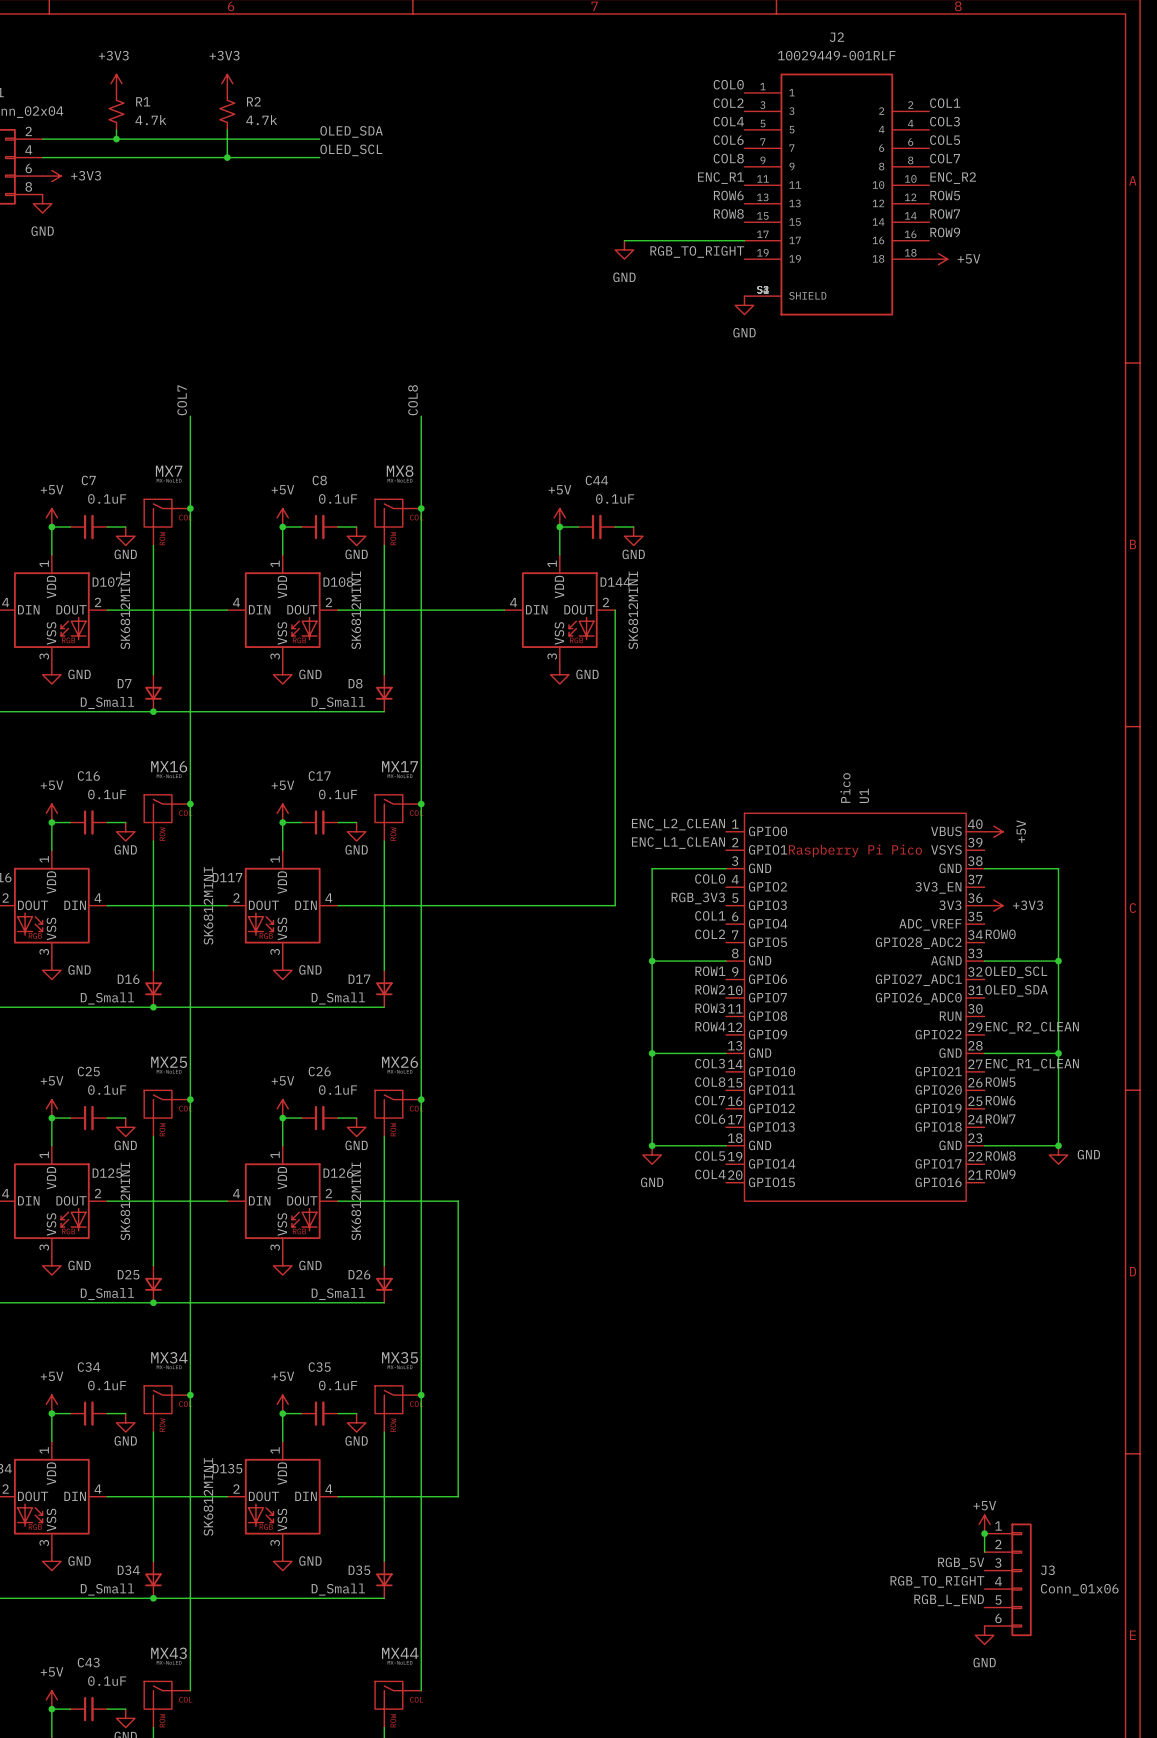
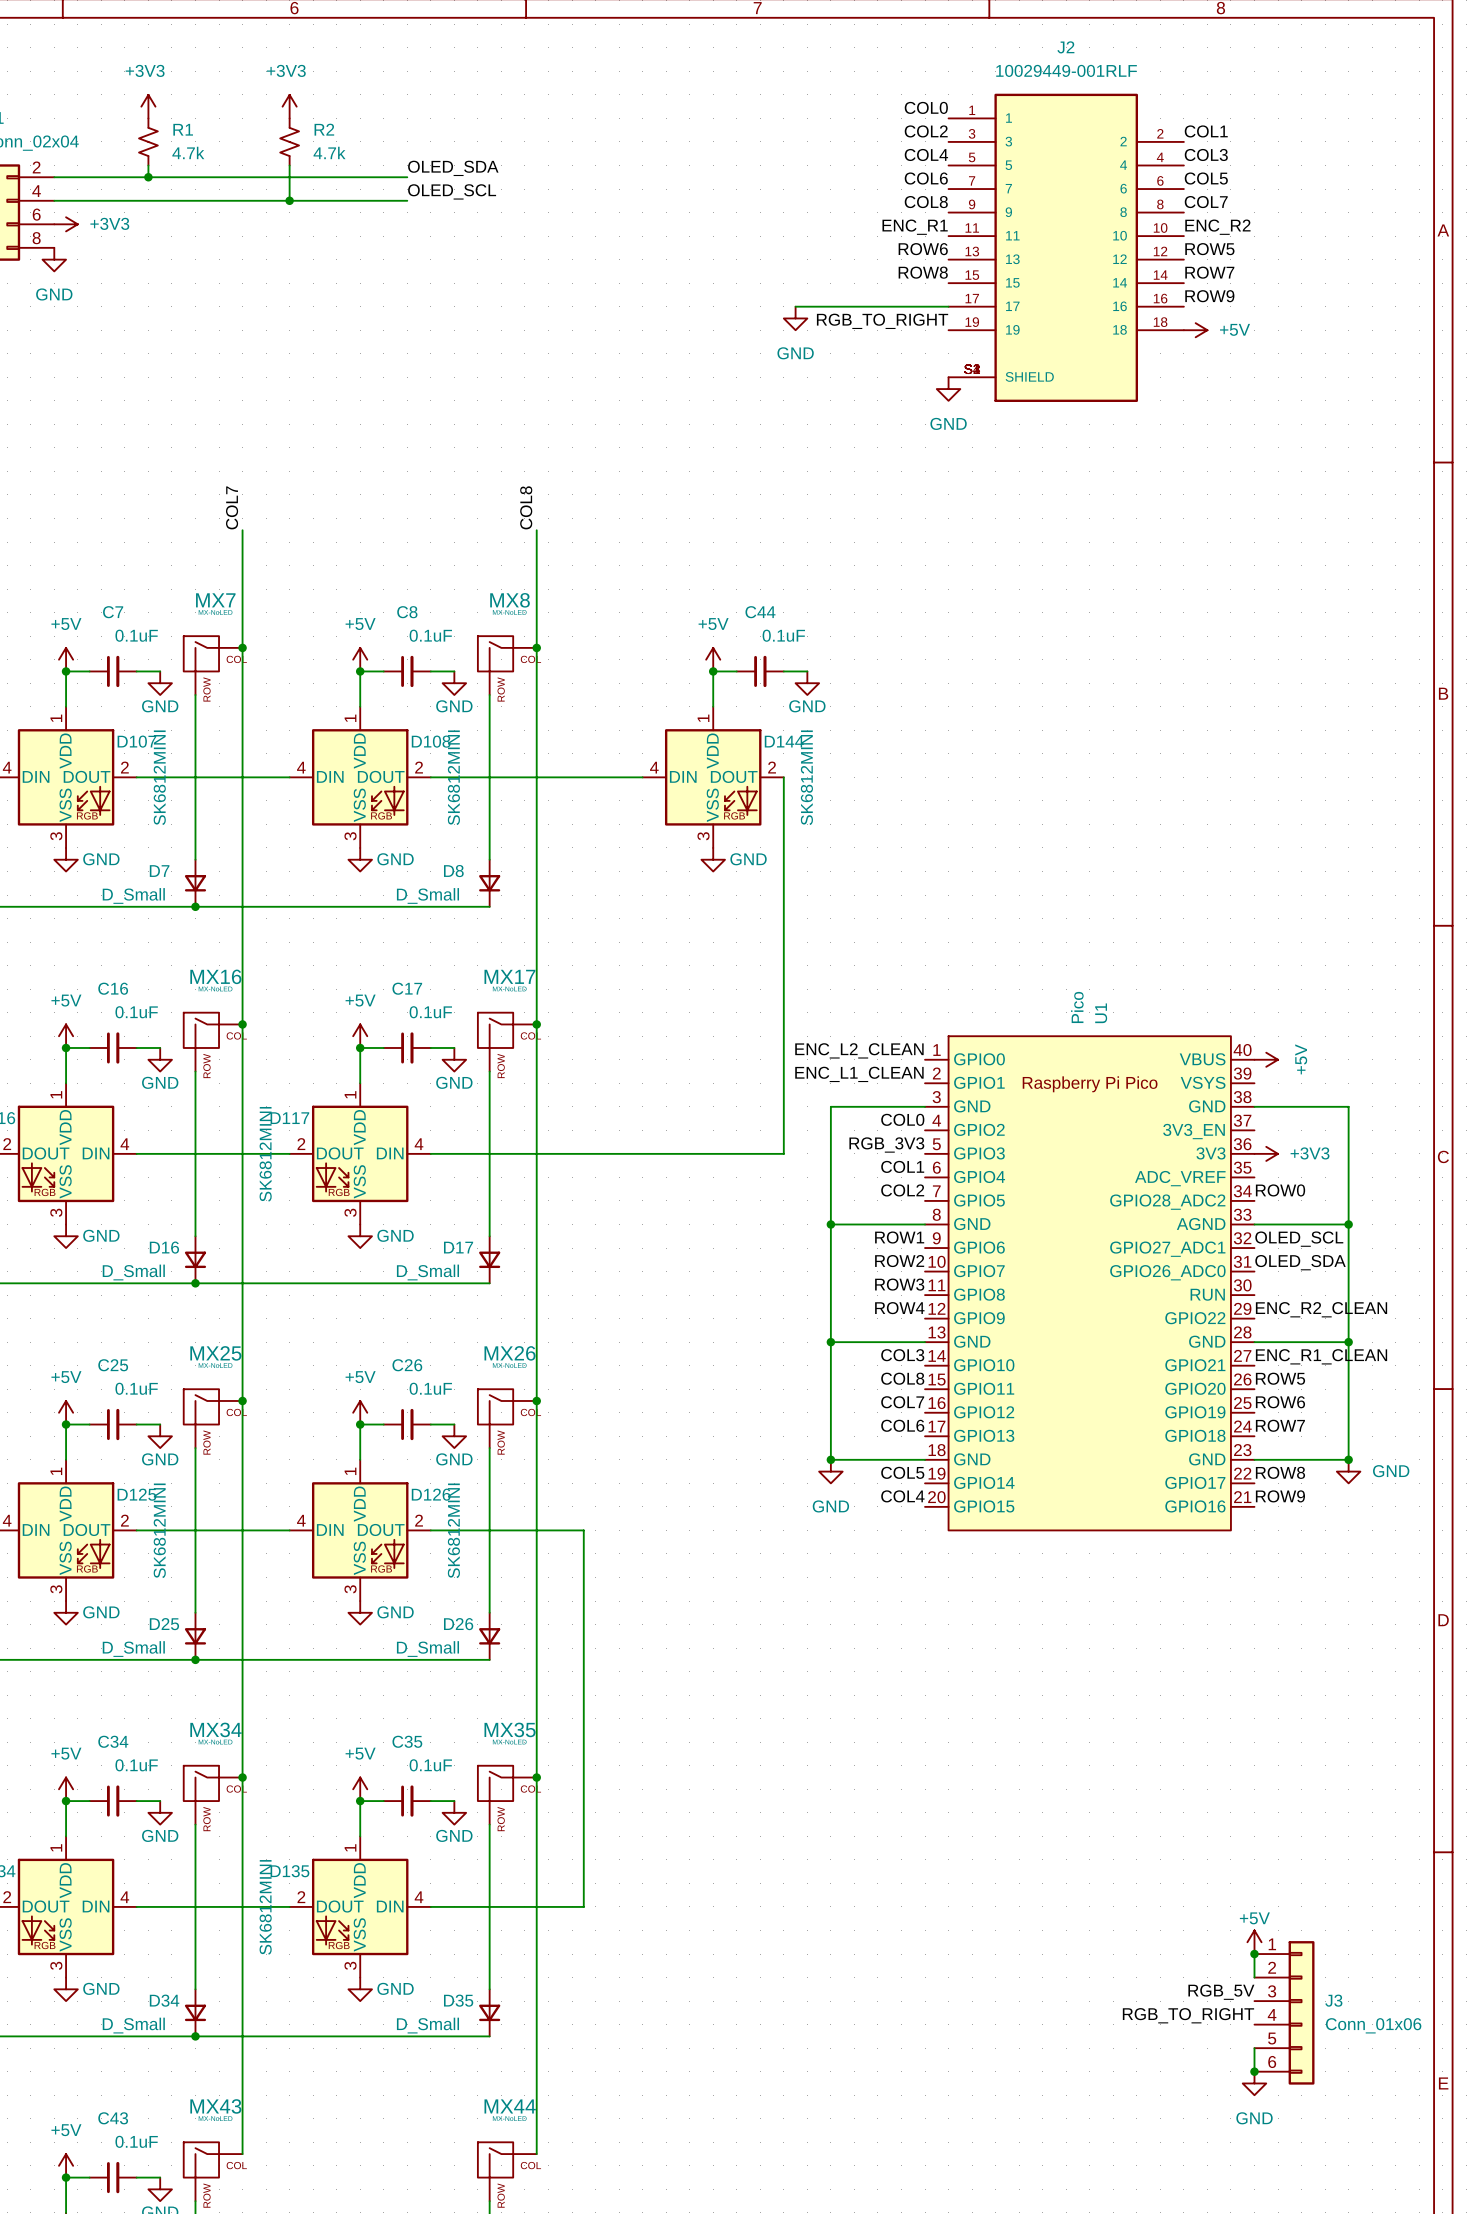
label: RGB_L_END (949, 1600) -> none
wire: none -> (1254, 2048) (1254, 2071)
junction: none -> (1254, 2071)

